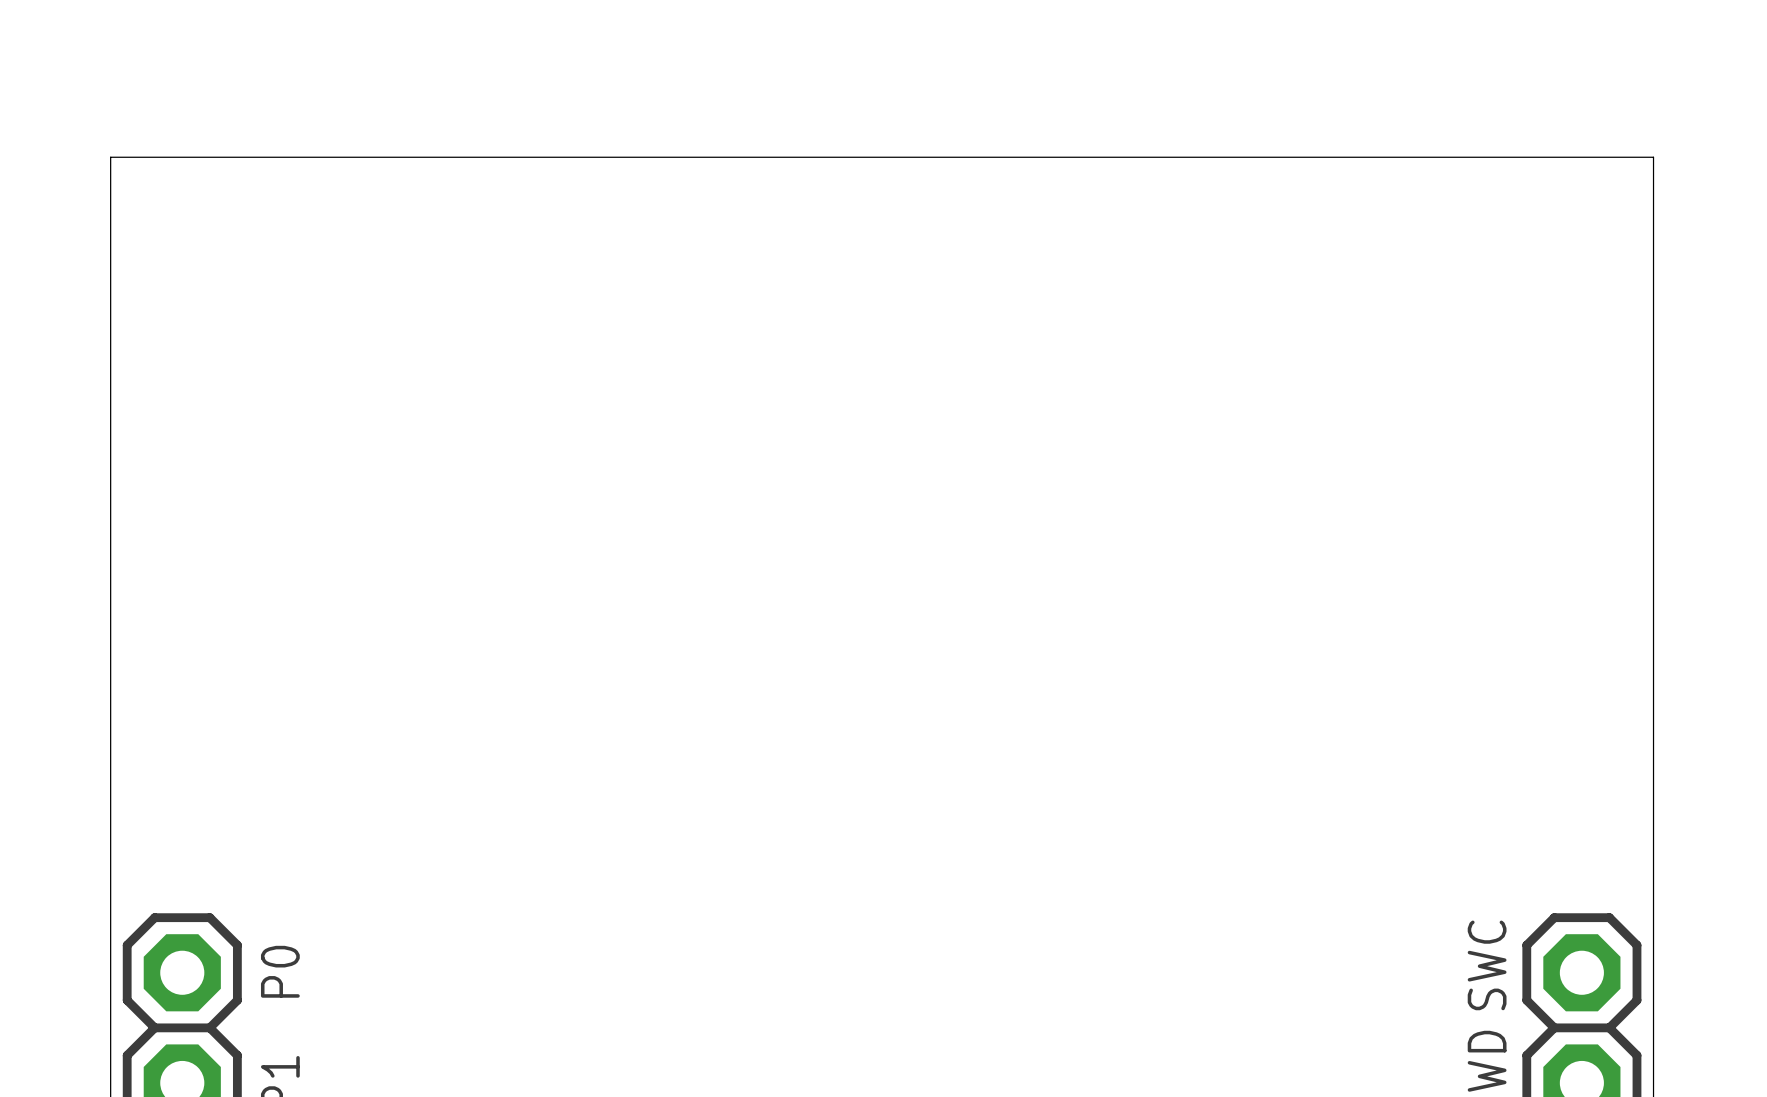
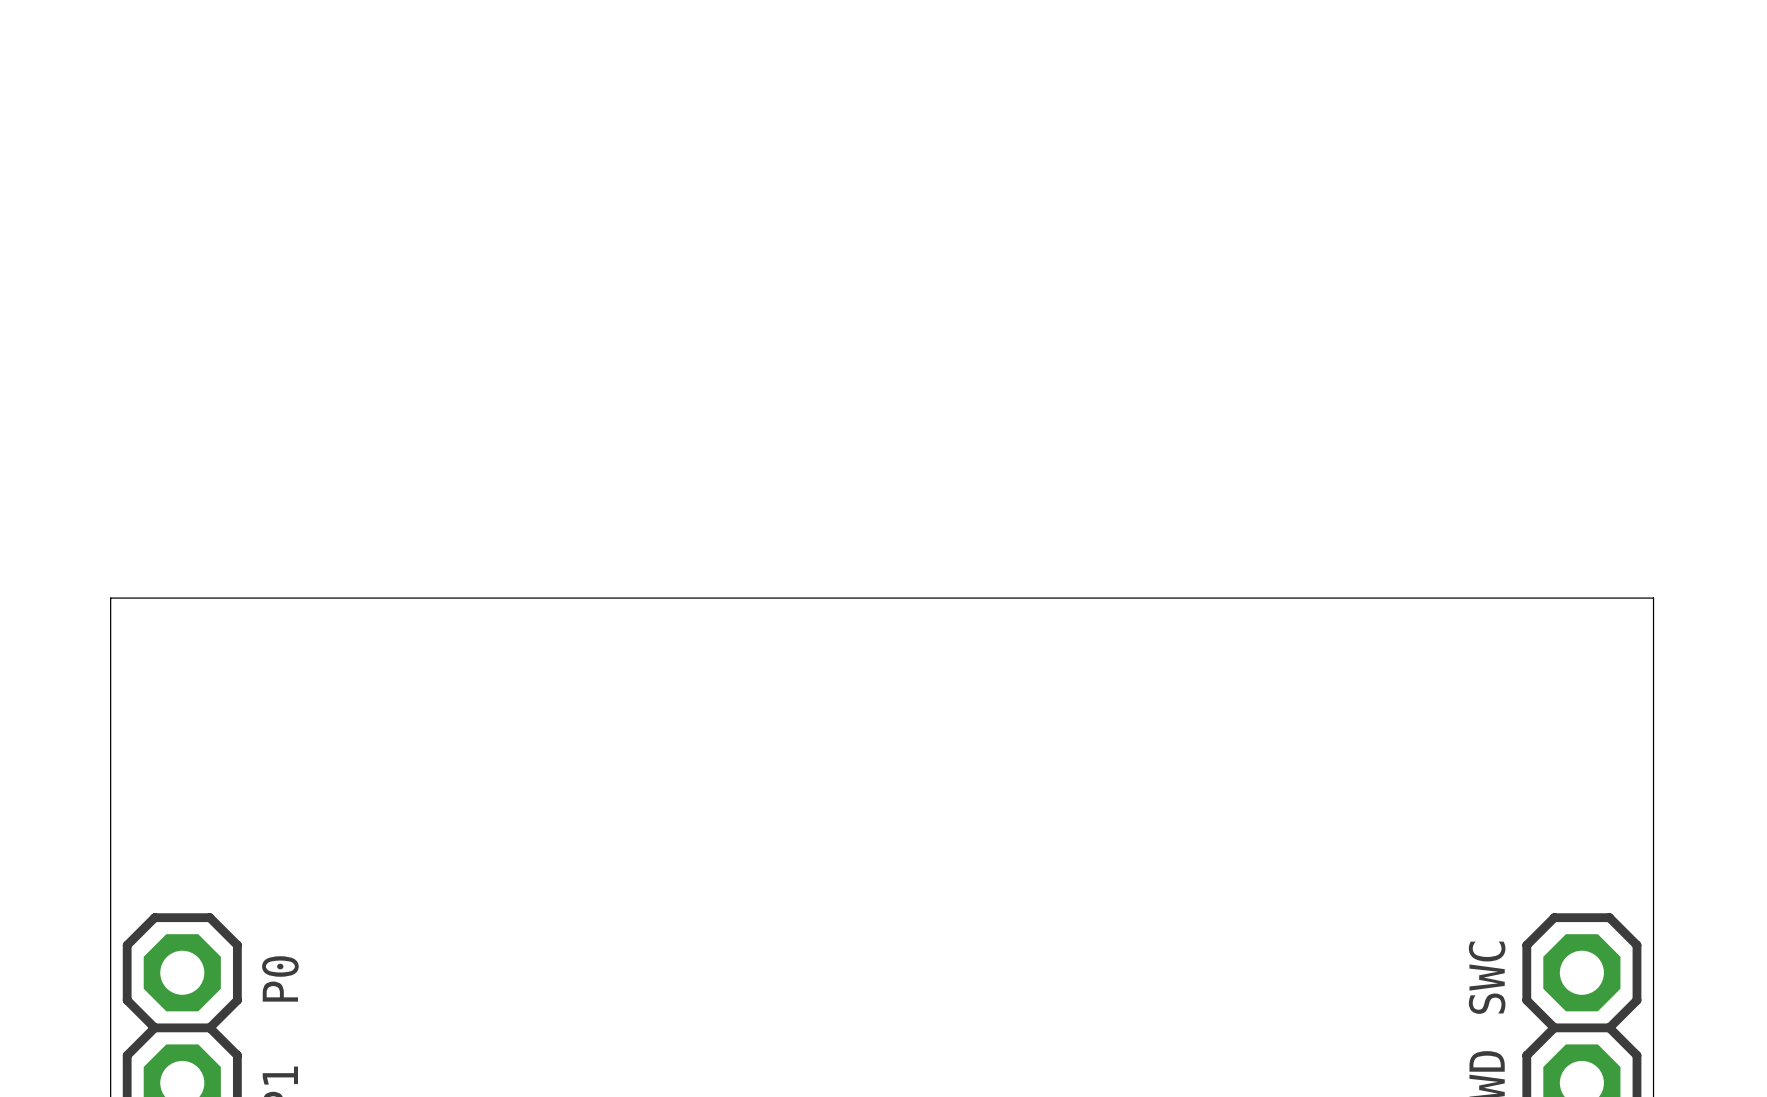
board edge: (1653, 598) (1653, 157) (110, 157) (110, 598) -> (1653, 598) (110, 598)

